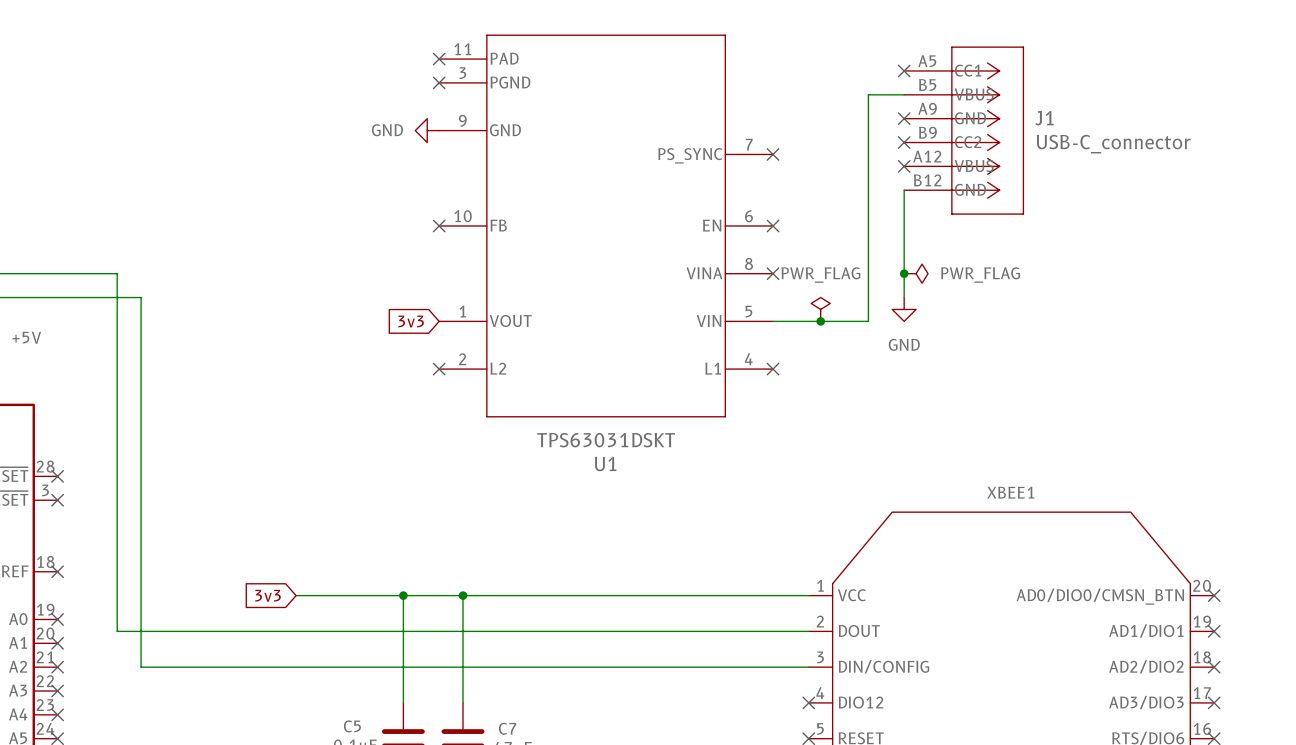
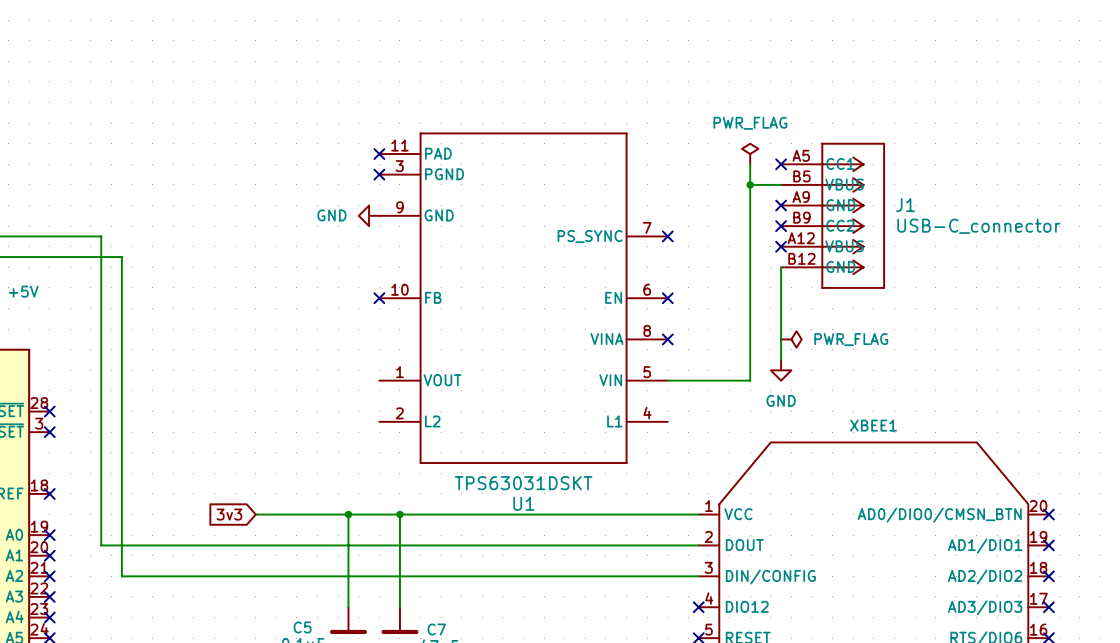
no-connect mark: (439, 59) -> none
no-connect mark: (904, 70) -> none
no-connect mark: (439, 82) -> none
wire: (904, 94) (868, 94) (868, 190) -> none
no-connect mark: (904, 118) -> none
power symbol position: GND (427, 130) -> GND (369, 215)
J1 position: (964, 130) -> (832, 215)
no-connect mark: (904, 142) -> none
no-connect mark: (773, 154) -> none
no-connect mark: (904, 166) -> none
no-connect mark: none -> (379, 154)
power symbol: none -> PWR_FLAG (750, 154)
wire: (904, 190) (904, 297) -> (781, 267) (781, 360)
no-connect mark: none -> (781, 164)
no-connect mark: none -> (379, 174)
wire: none -> (750, 184) (781, 184)
junction: none -> (750, 184)
no-connect mark: (439, 225) -> none
U1 position: (606, 225) -> (523, 298)
no-connect mark: (773, 225) -> none
no-connect mark: none -> (781, 205)
no-connect mark: none -> (781, 226)
junction: (904, 273) -> none
power symbol: PWR_FLAG (916, 273) -> none
no-connect mark: none -> (781, 246)
power symbol: PWR_FLAG (820, 309) -> none
power symbol position: GND (904, 309) -> GND (781, 370)
global label: 3v3 (411, 321) -> none
wire: (773, 321) (868, 321) -> (667, 380) (750, 380) (750, 277)
junction: (820, 321) -> none
no-connect mark: none -> (667, 298)
no-connect mark position: (439, 369) -> (379, 298)
no-connect mark: (773, 369) -> none
no-connect mark: none -> (667, 339)
power symbol: none -> PWR_FLAG (791, 339)

